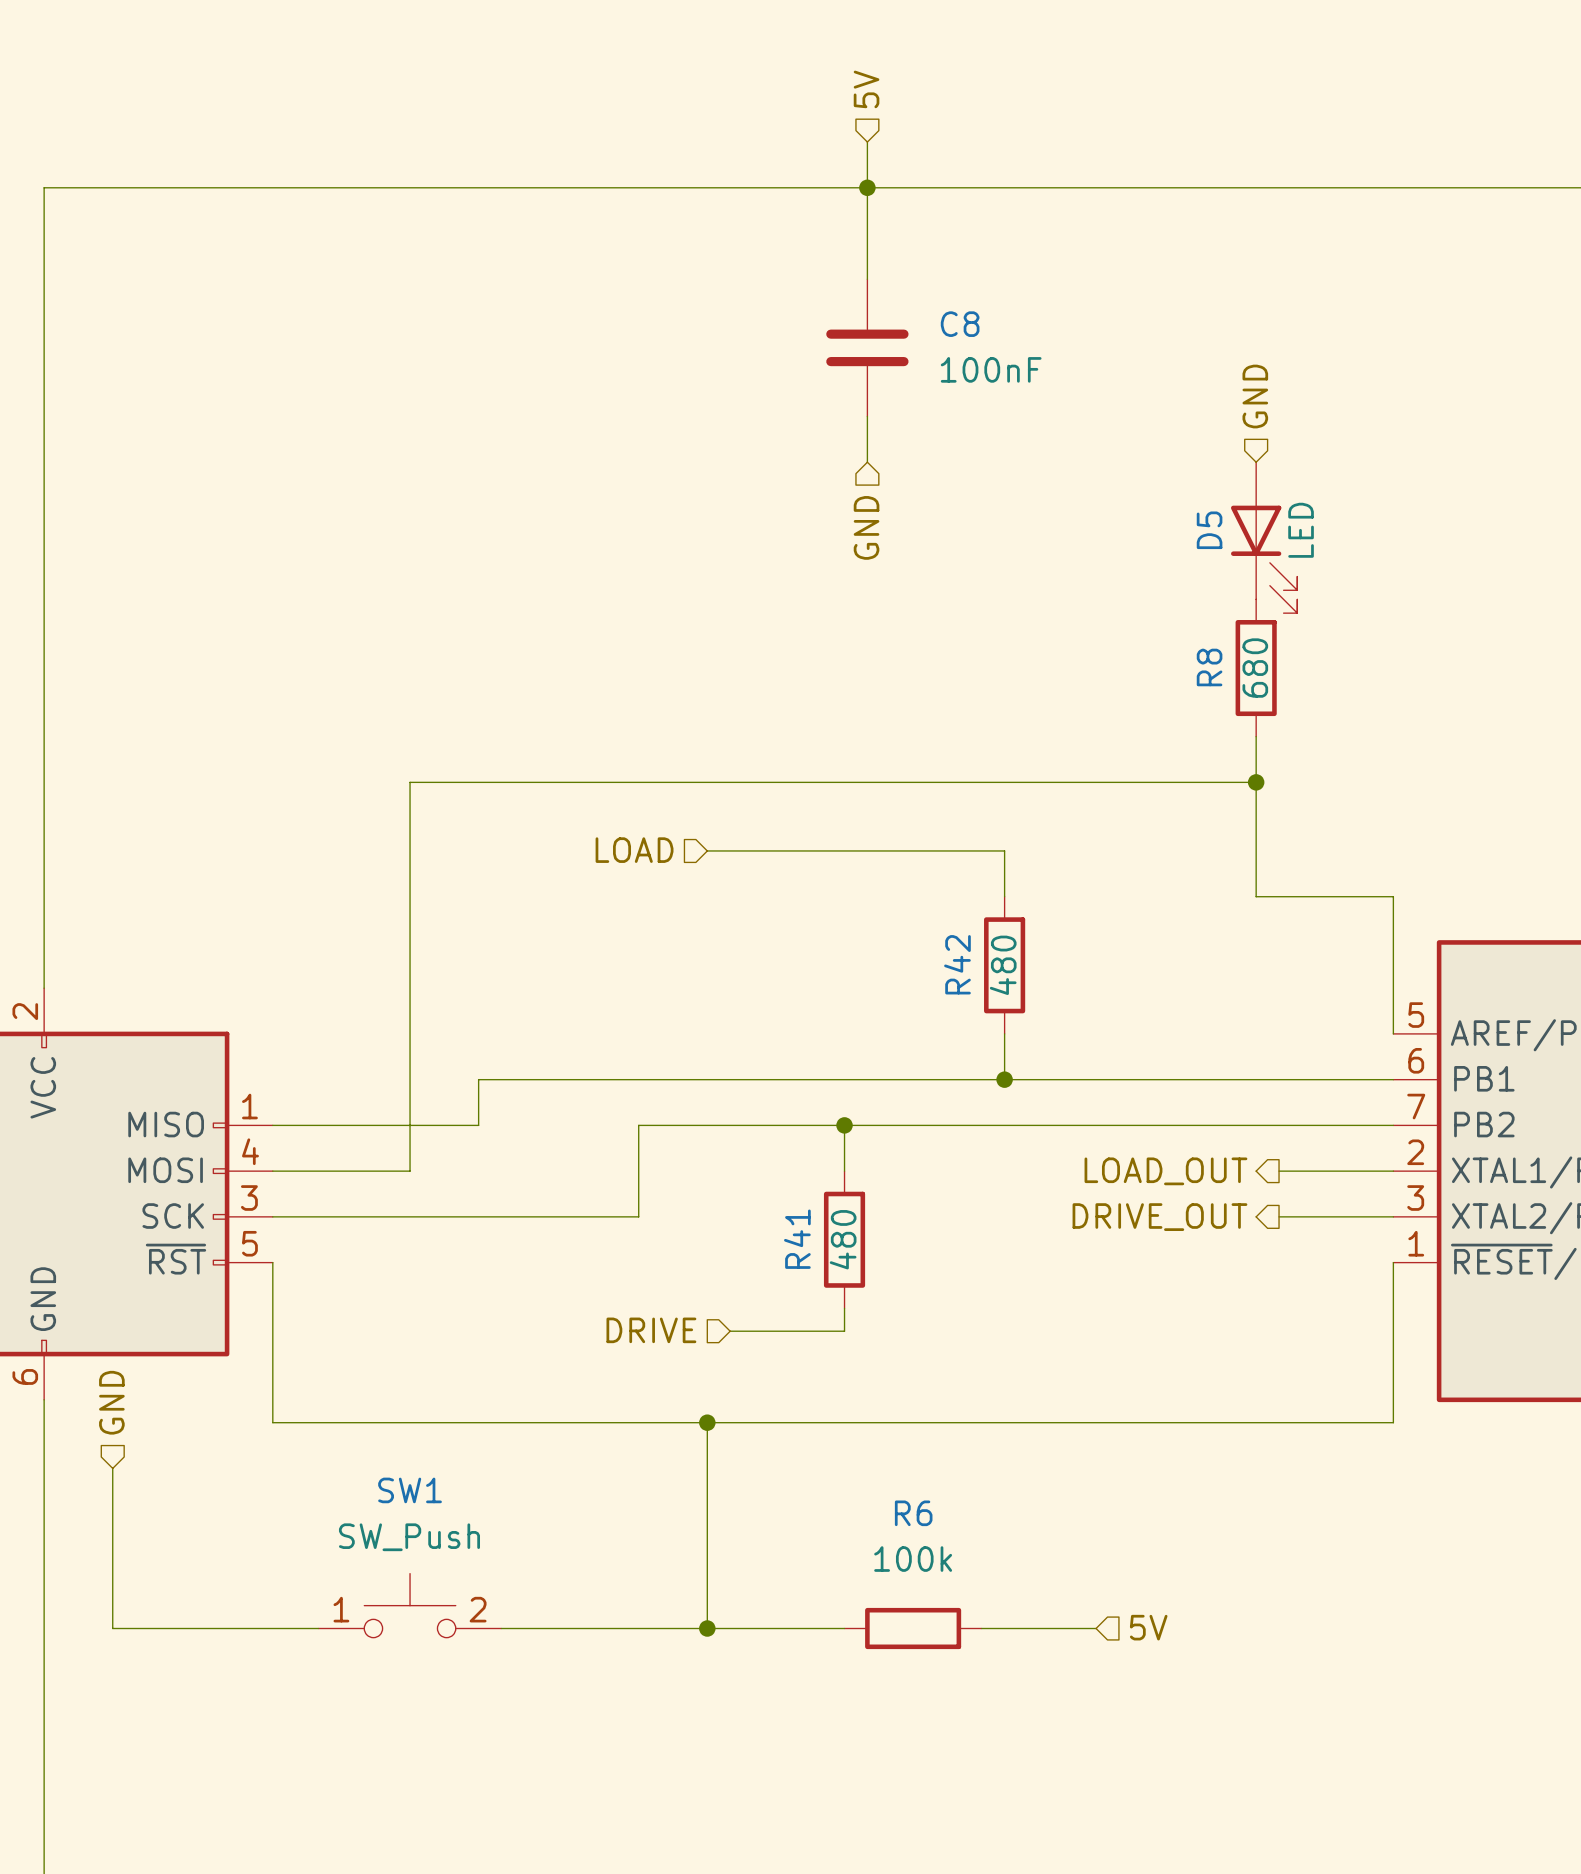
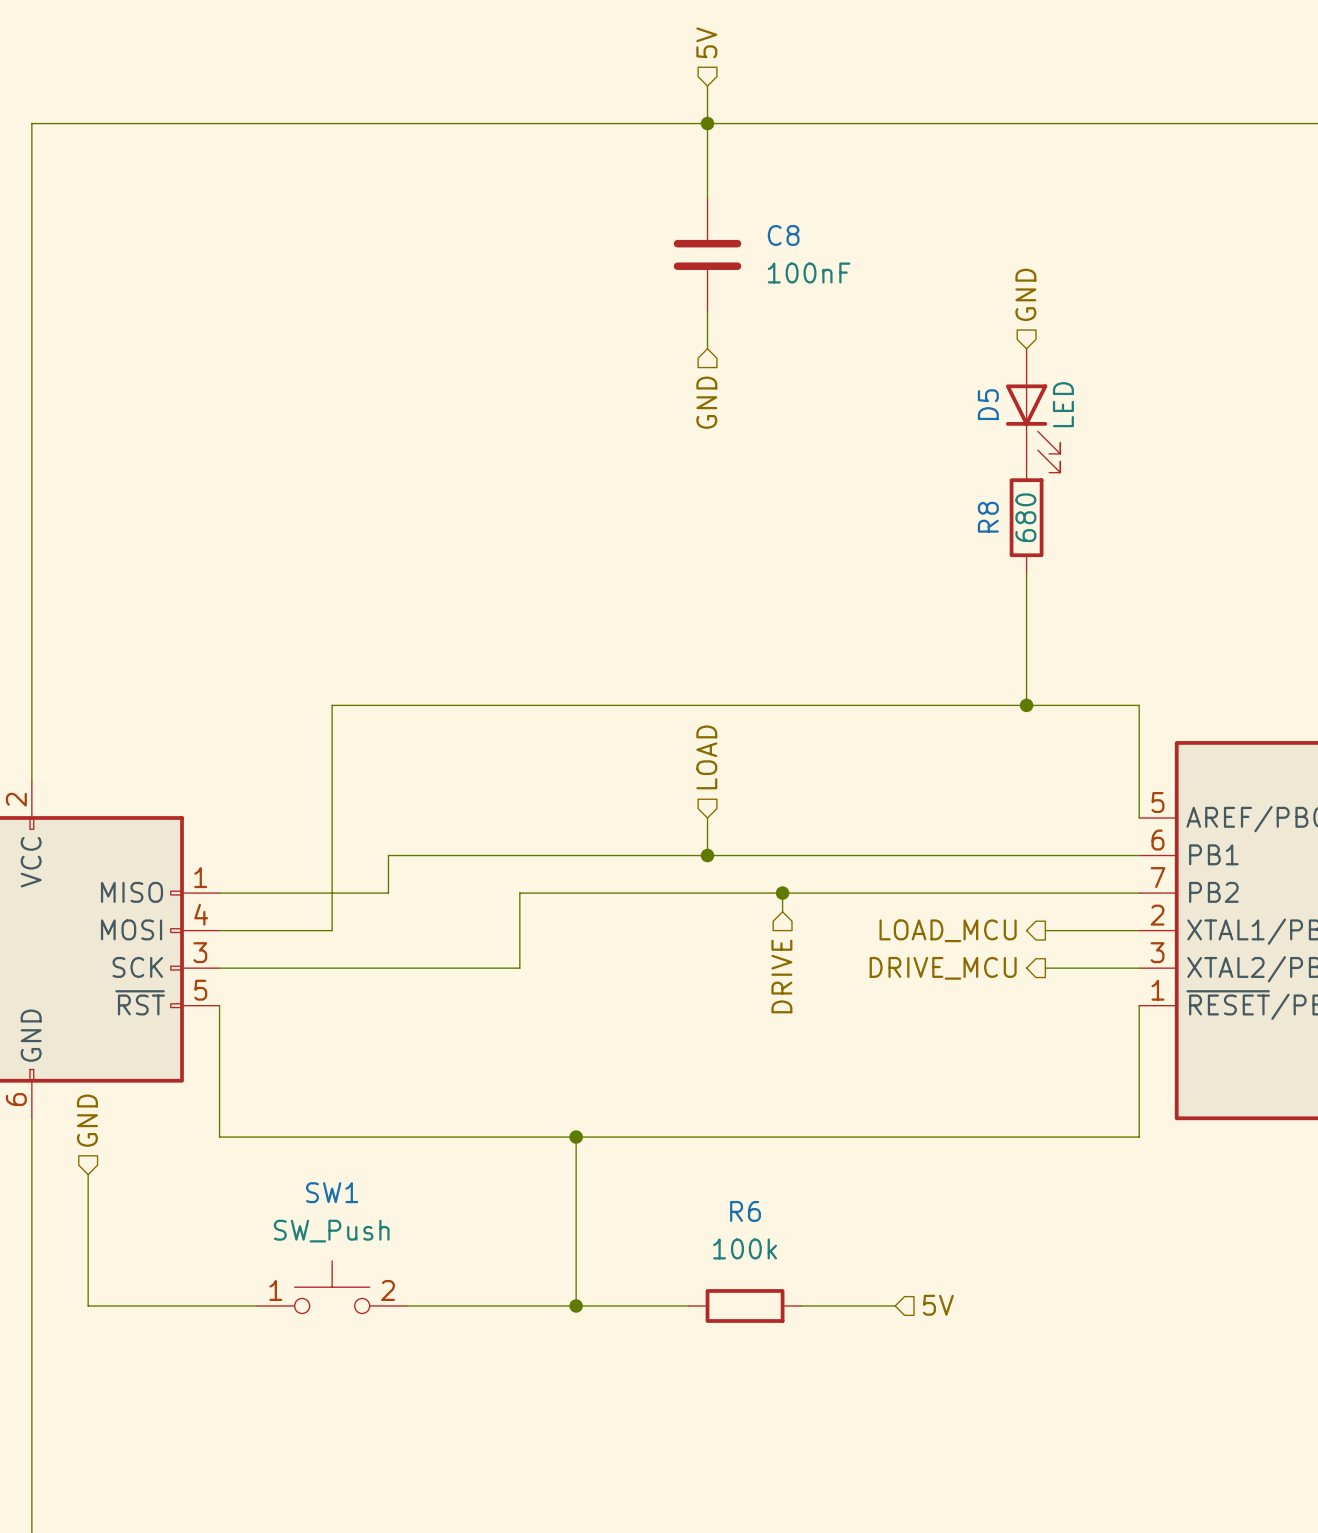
wire: (1256, 782) (410, 782) (410, 896) -> (1026, 705) (332, 705)
junction: (1256, 782) -> none
hierarchical label rotation: 0° (634, 850) -> 90° clockwise (706, 757)
hierarchical label position: LOAD (634, 850) -> LOAD (706, 757)
wire: (707, 850) (1004, 850) (1004, 896) -> none
junction: none -> (1026, 705)
R42: 480 (1004, 965) -> none
wire: (1004, 1033) (1004, 1079) -> none
junction: (1004, 1079) -> none
wire: (844, 1125) (844, 1171) -> (707, 818) (707, 855)
junction position: (844, 1125) -> (707, 855)
wire: none -> (782, 893) (782, 911)
junction: none -> (782, 893)
hierarchical label: LOAD_OUT (1165, 1171) -> LOAD_MCU (948, 930)
hierarchical label: DRIVE_OUT (1159, 1217) -> DRIVE_MCU (943, 968)
R41: 480 (844, 1239) -> none
wire: (844, 1308) (844, 1331) (730, 1331) -> none
hierarchical label rotation: 0° (651, 1330) -> 90° counterclockwise (781, 976)
hierarchical label position: DRIVE (651, 1330) -> DRIVE (781, 976)

